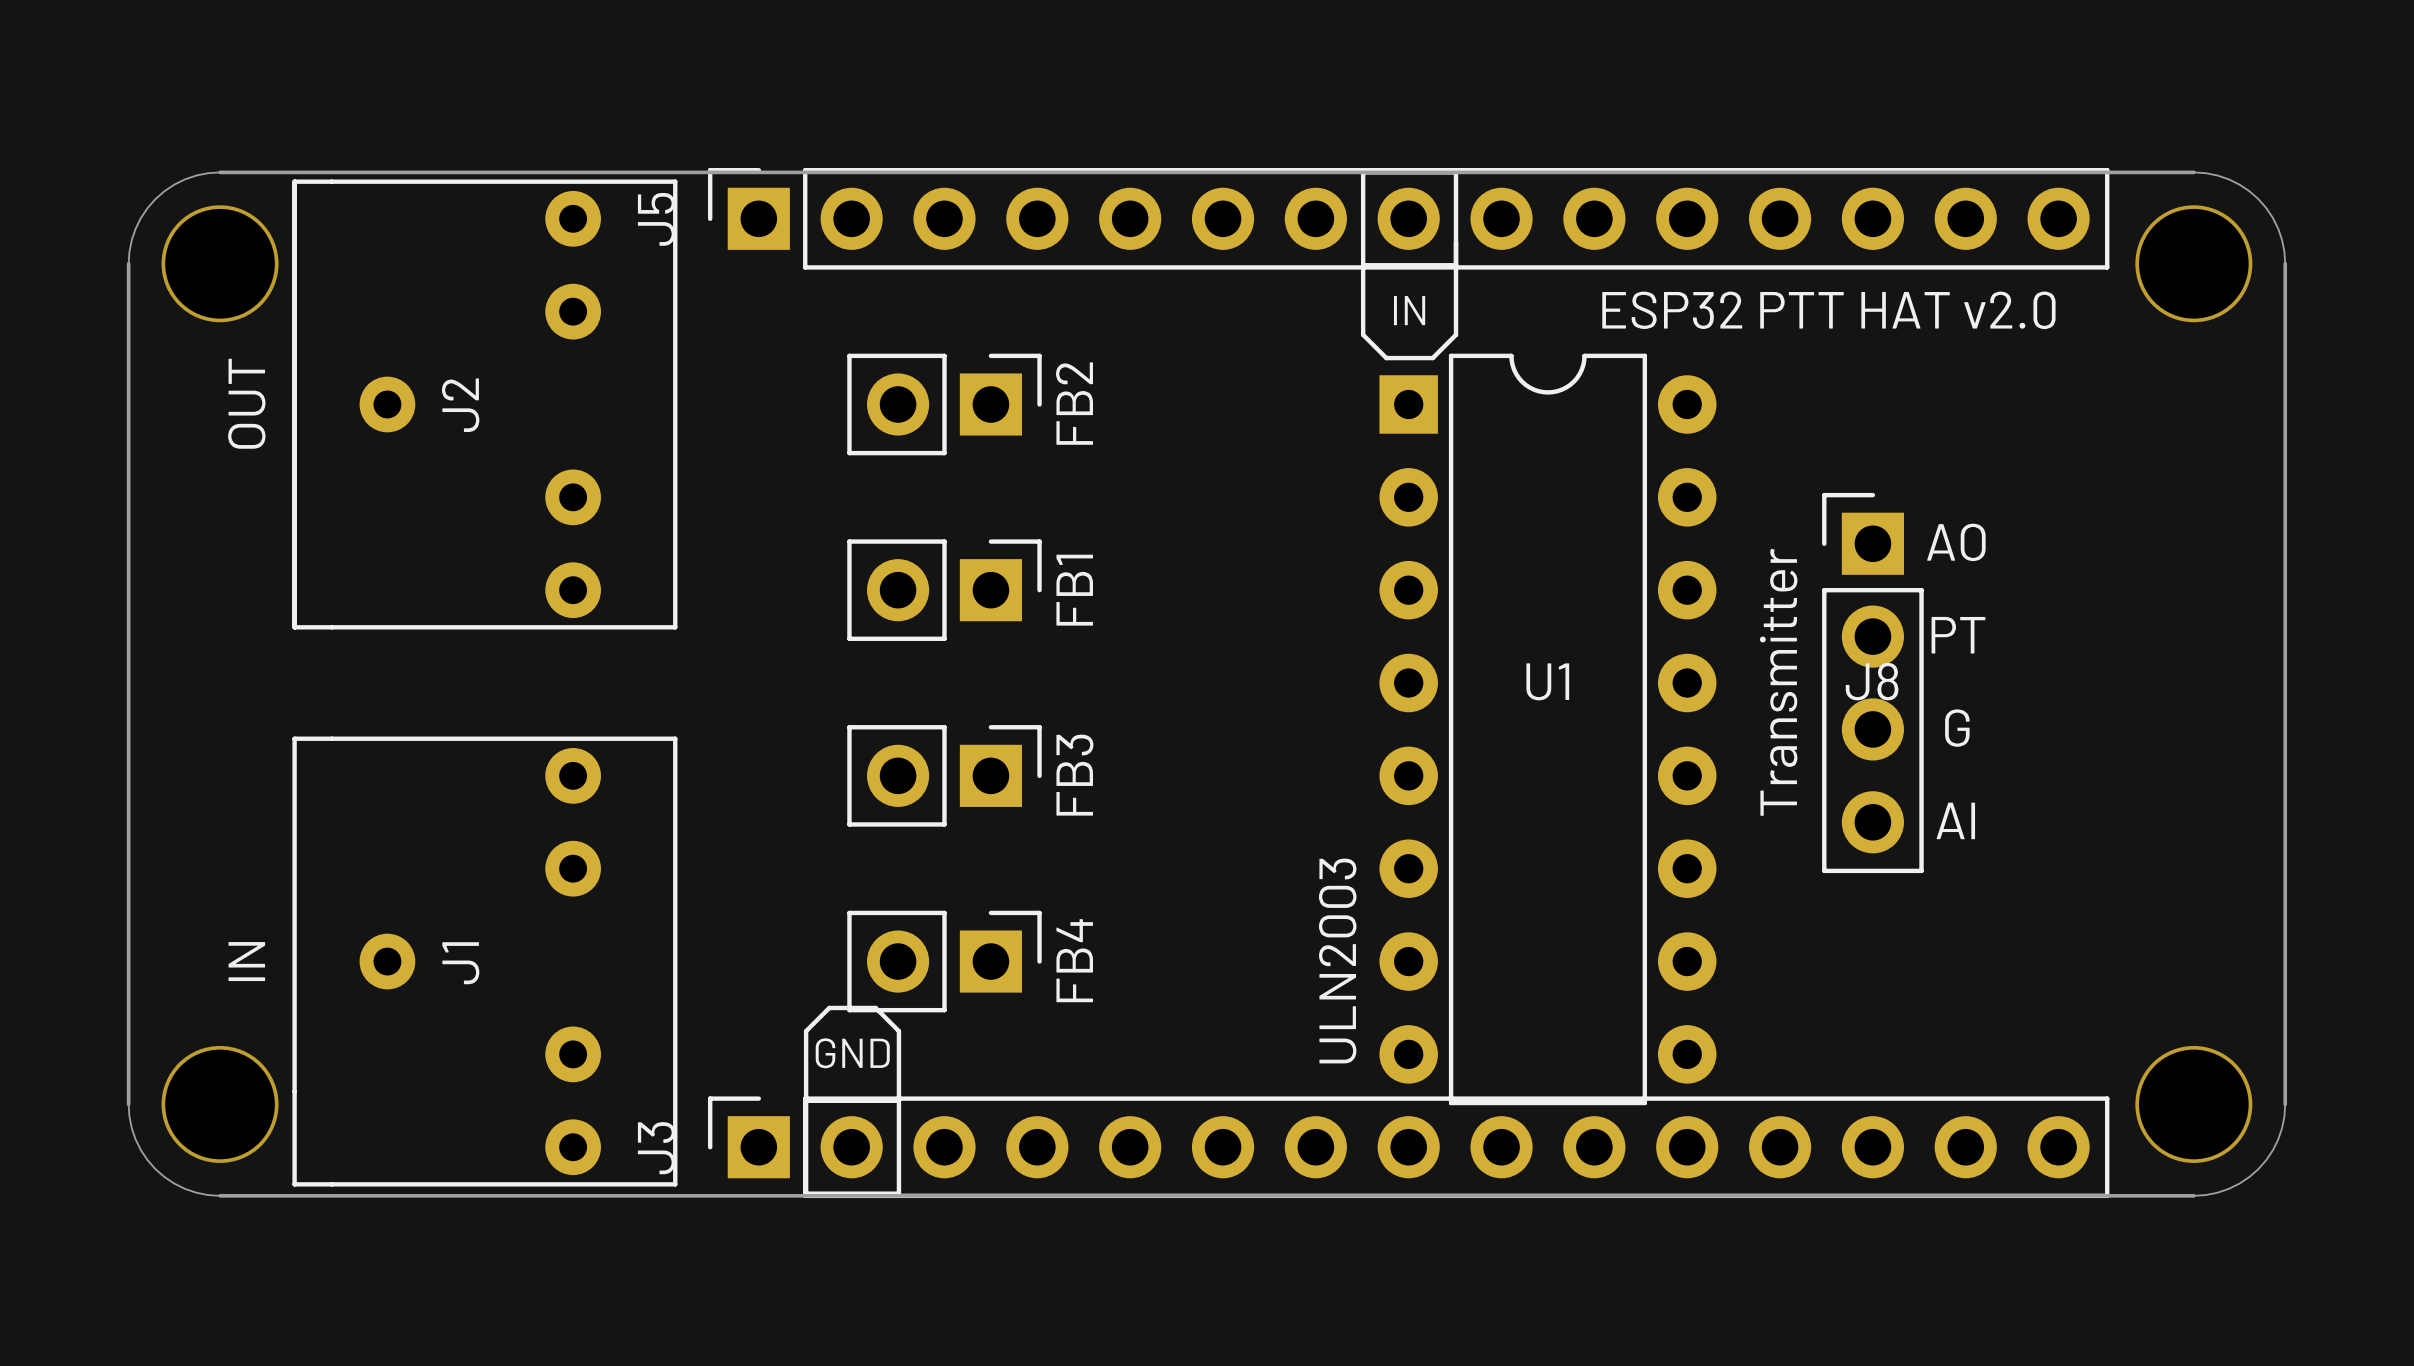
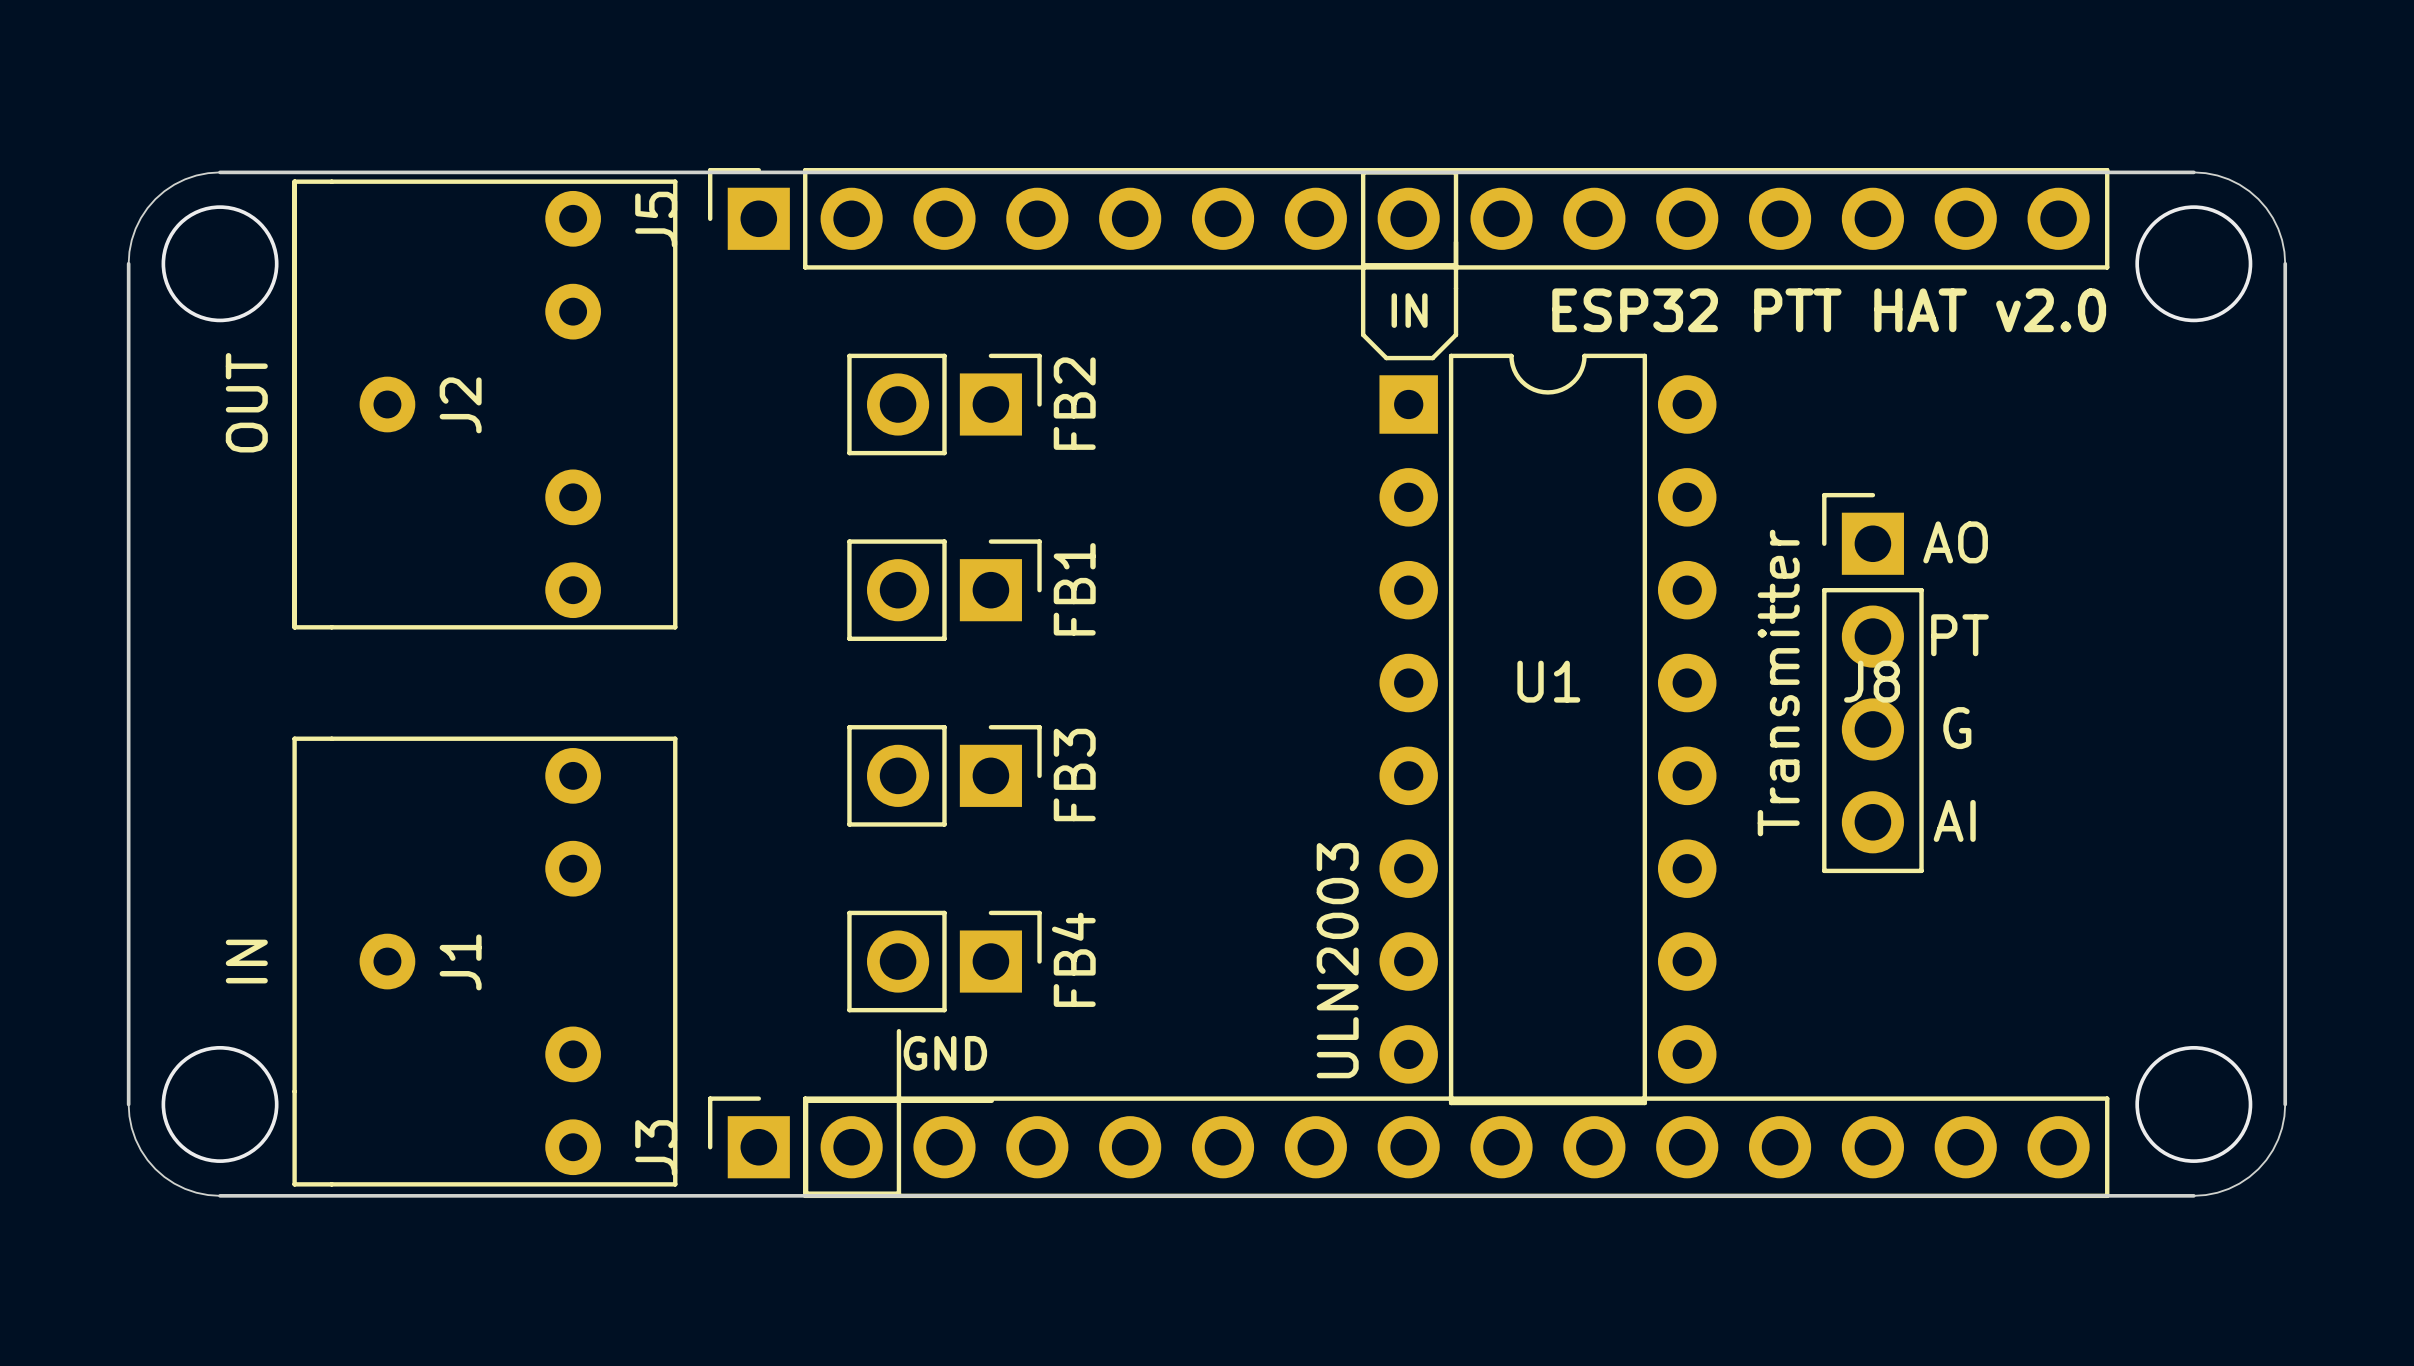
line: (898, 1031) (875, 1007) (829, 1007) (806, 1031) (806, 1098) -> none
text position: GND (852, 1053) -> GND (945, 1053)
line: none -> (898, 1100) (991, 1100)

